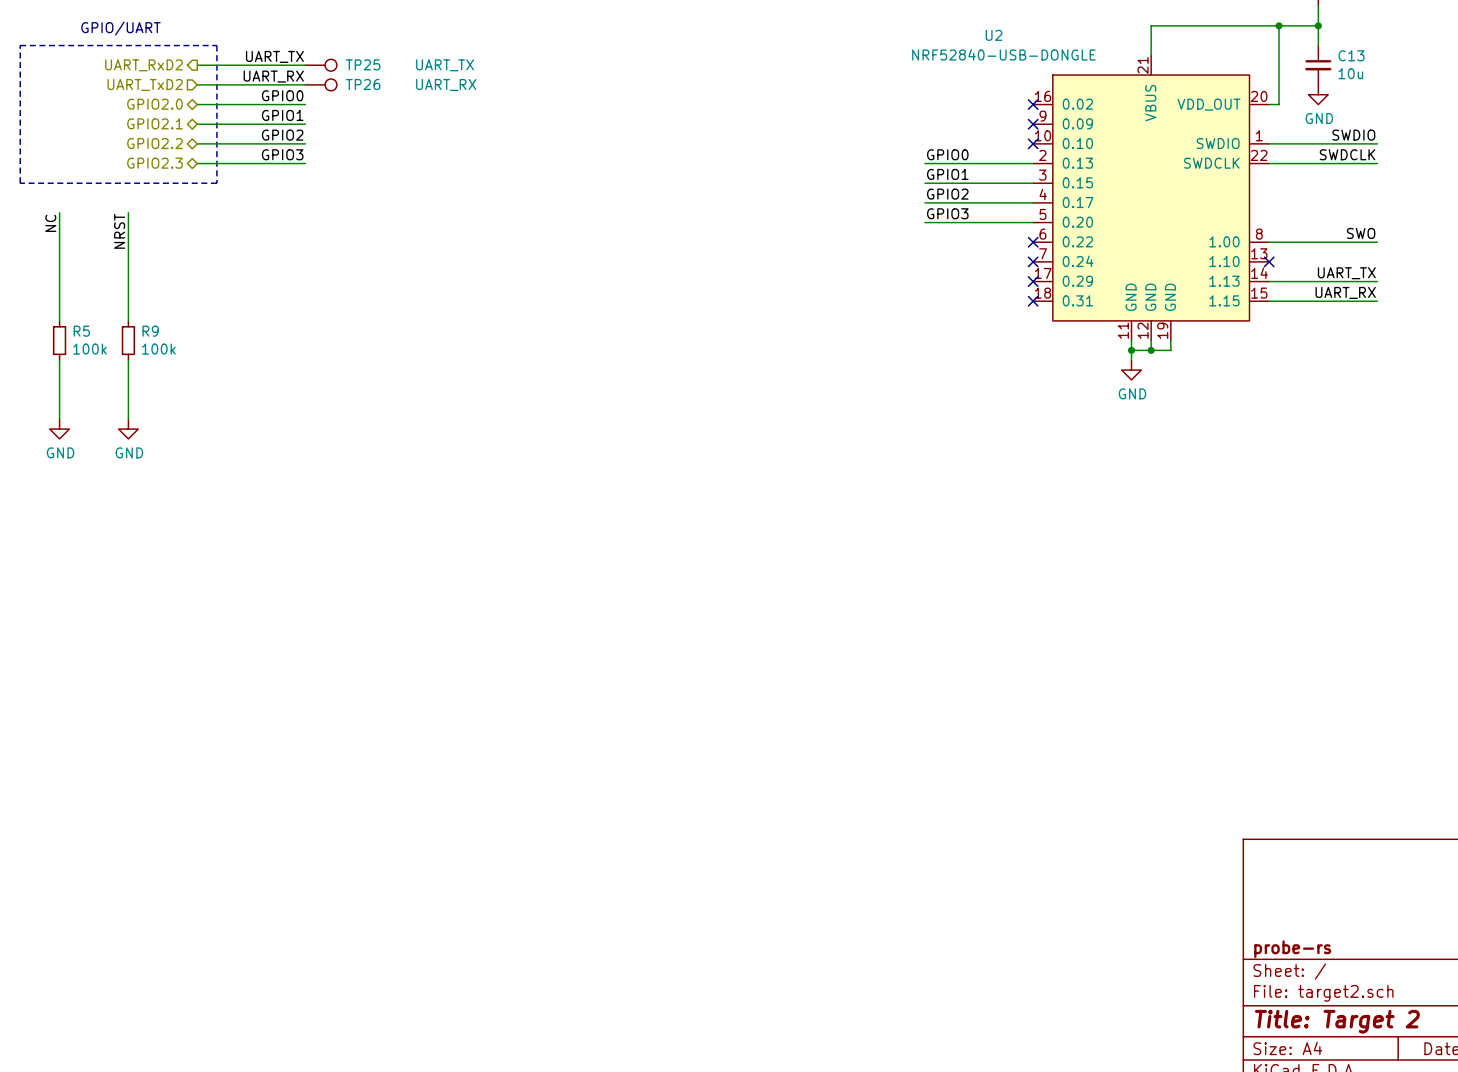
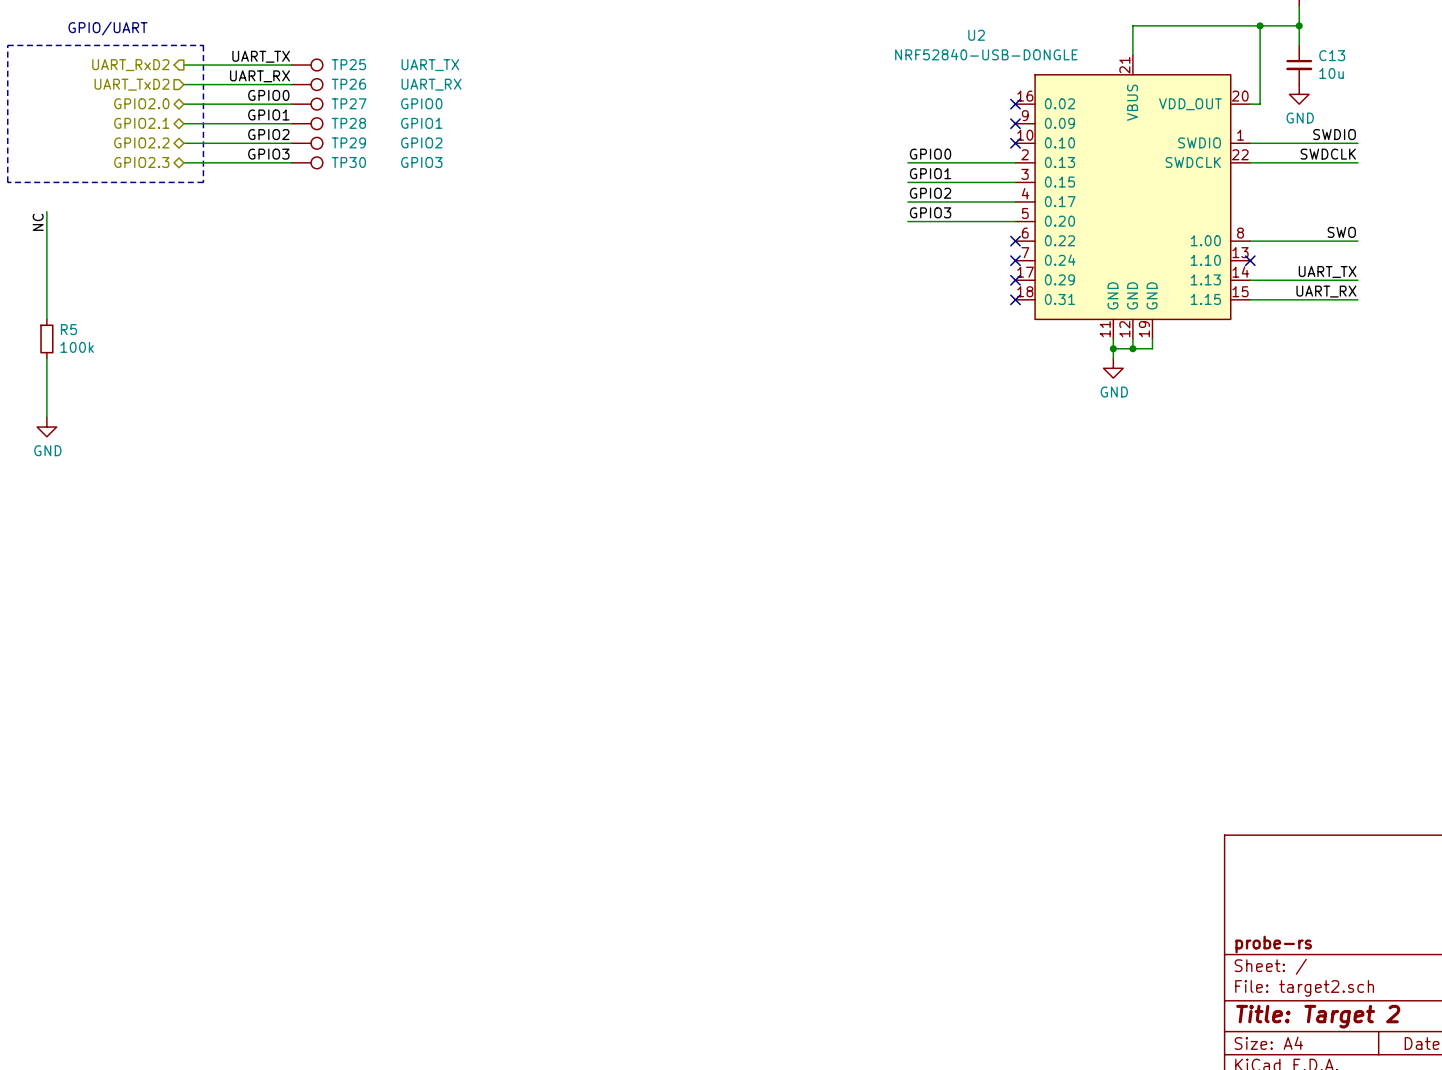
TP27: none -> GPIO0 (307, 104)
TP28: none -> GPIO1 (307, 123)
TP29: none -> GPIO2 (307, 143)
TP30: none -> GPIO3 (307, 162)
wire: (128, 212) (128, 320) -> none
label: NRST (119, 231) -> none
R9: 100k (128, 340) -> none
wire: (128, 360) (128, 419) -> none
power symbol: GND (128, 429) -> none

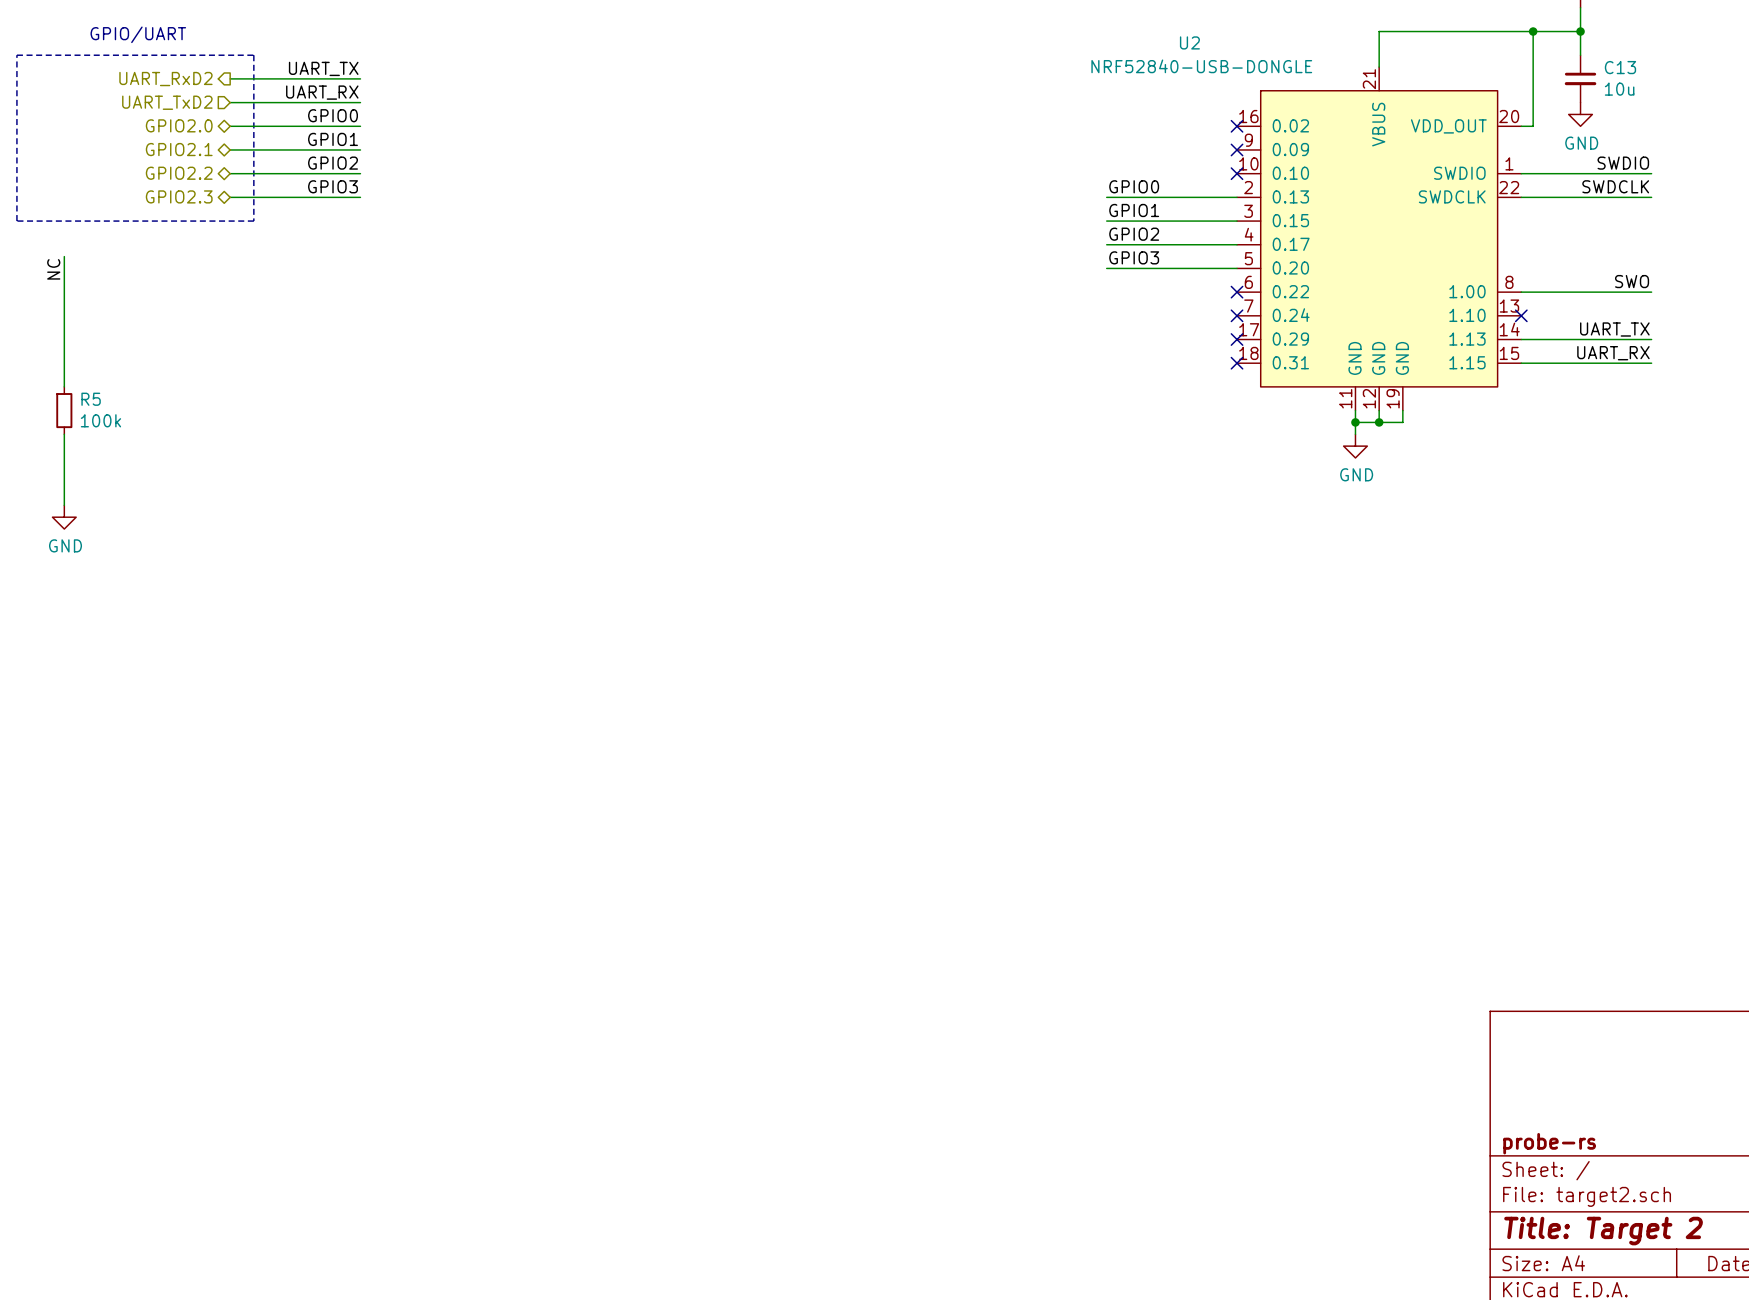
TP25: UART_TX (307, 65) -> none
TP26: UART_RX (307, 84) -> none
TP27: GPIO0 (307, 104) -> none
TP28: GPIO1 (307, 123) -> none
TP29: GPIO2 (307, 143) -> none
TP30: GPIO3 (307, 162) -> none

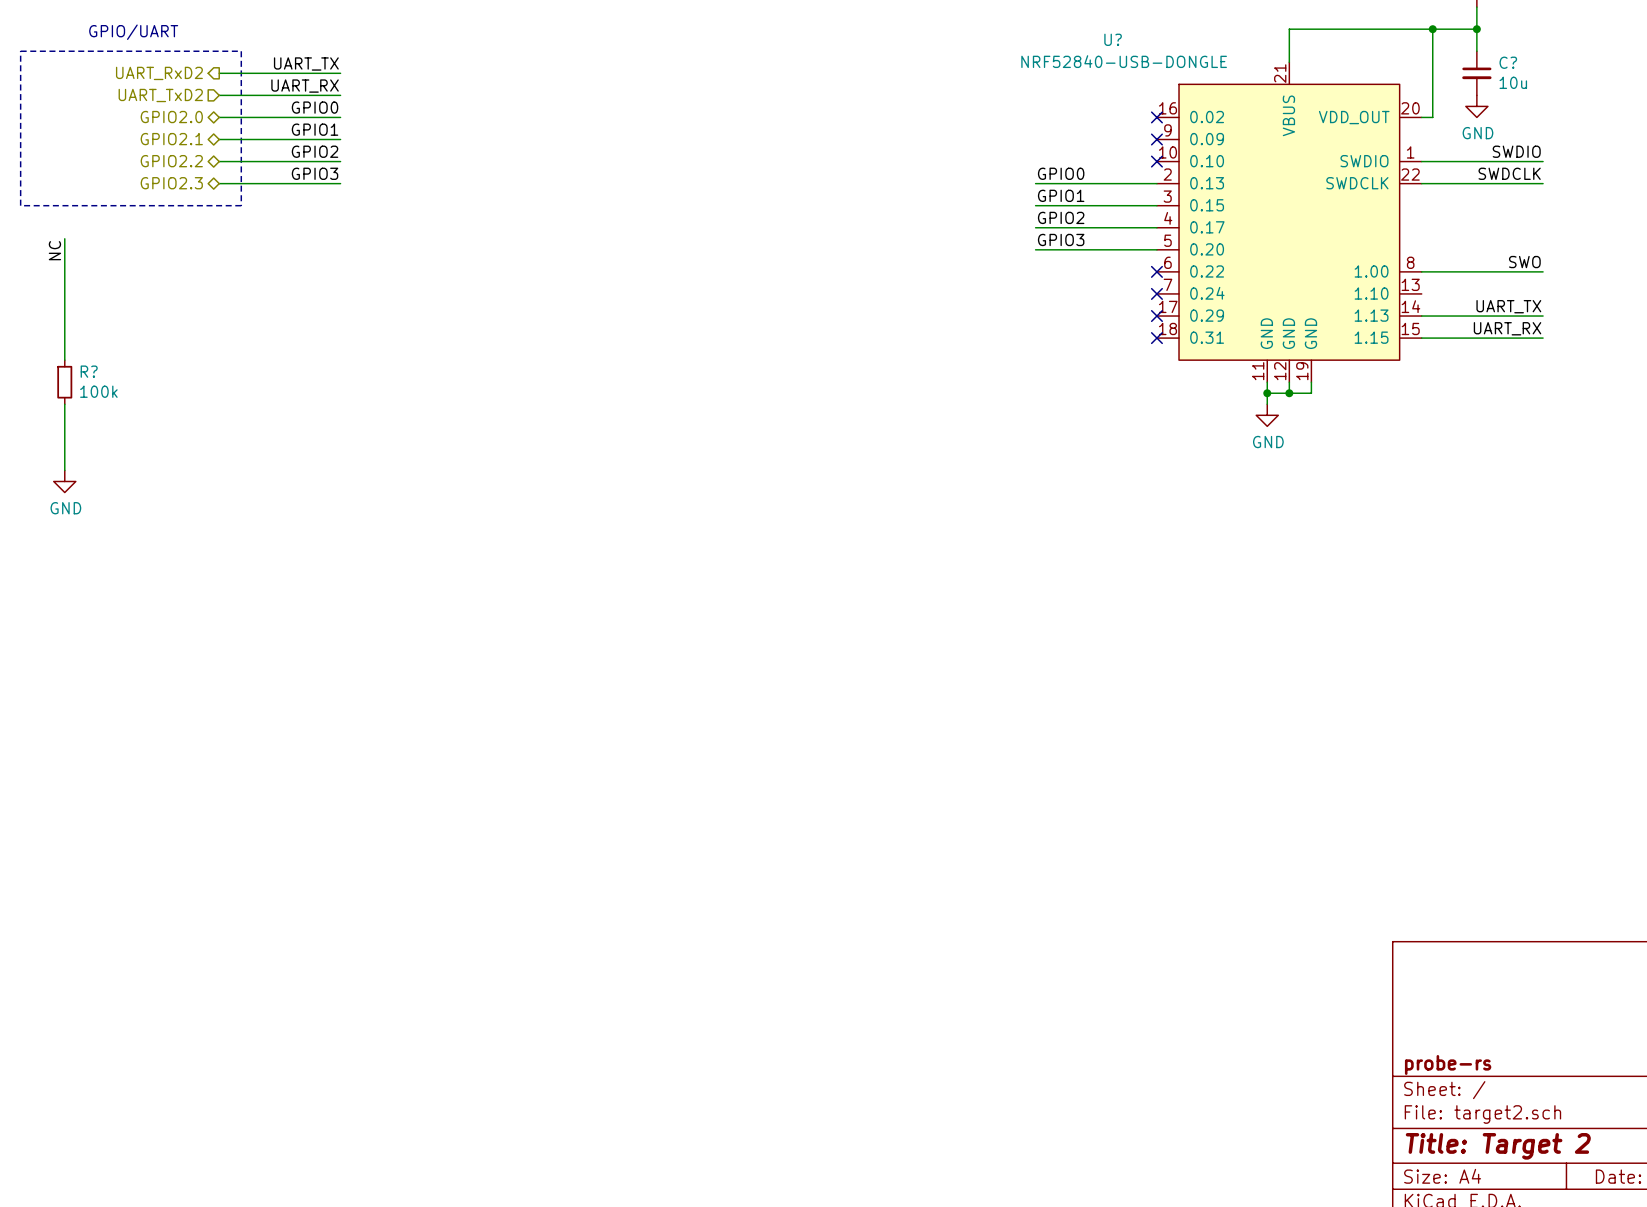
U2 name: U2 (1189, 42) -> U? (1113, 39)
C13 name: C13 (1620, 67) -> C? (1508, 62)
no-connect mark: (1521, 315) -> none
R5 name: R5 (91, 399) -> R? (89, 371)

